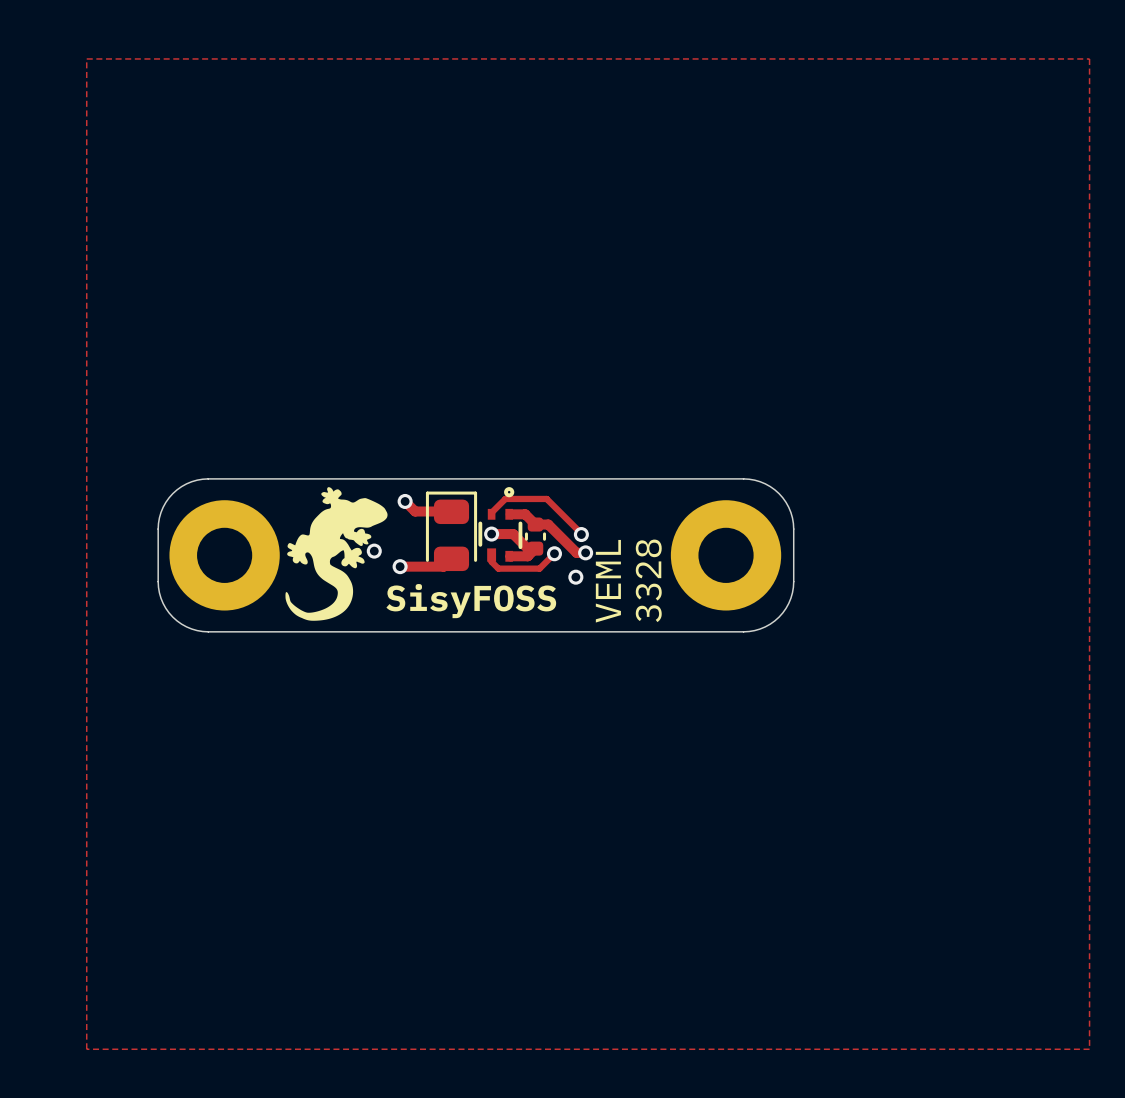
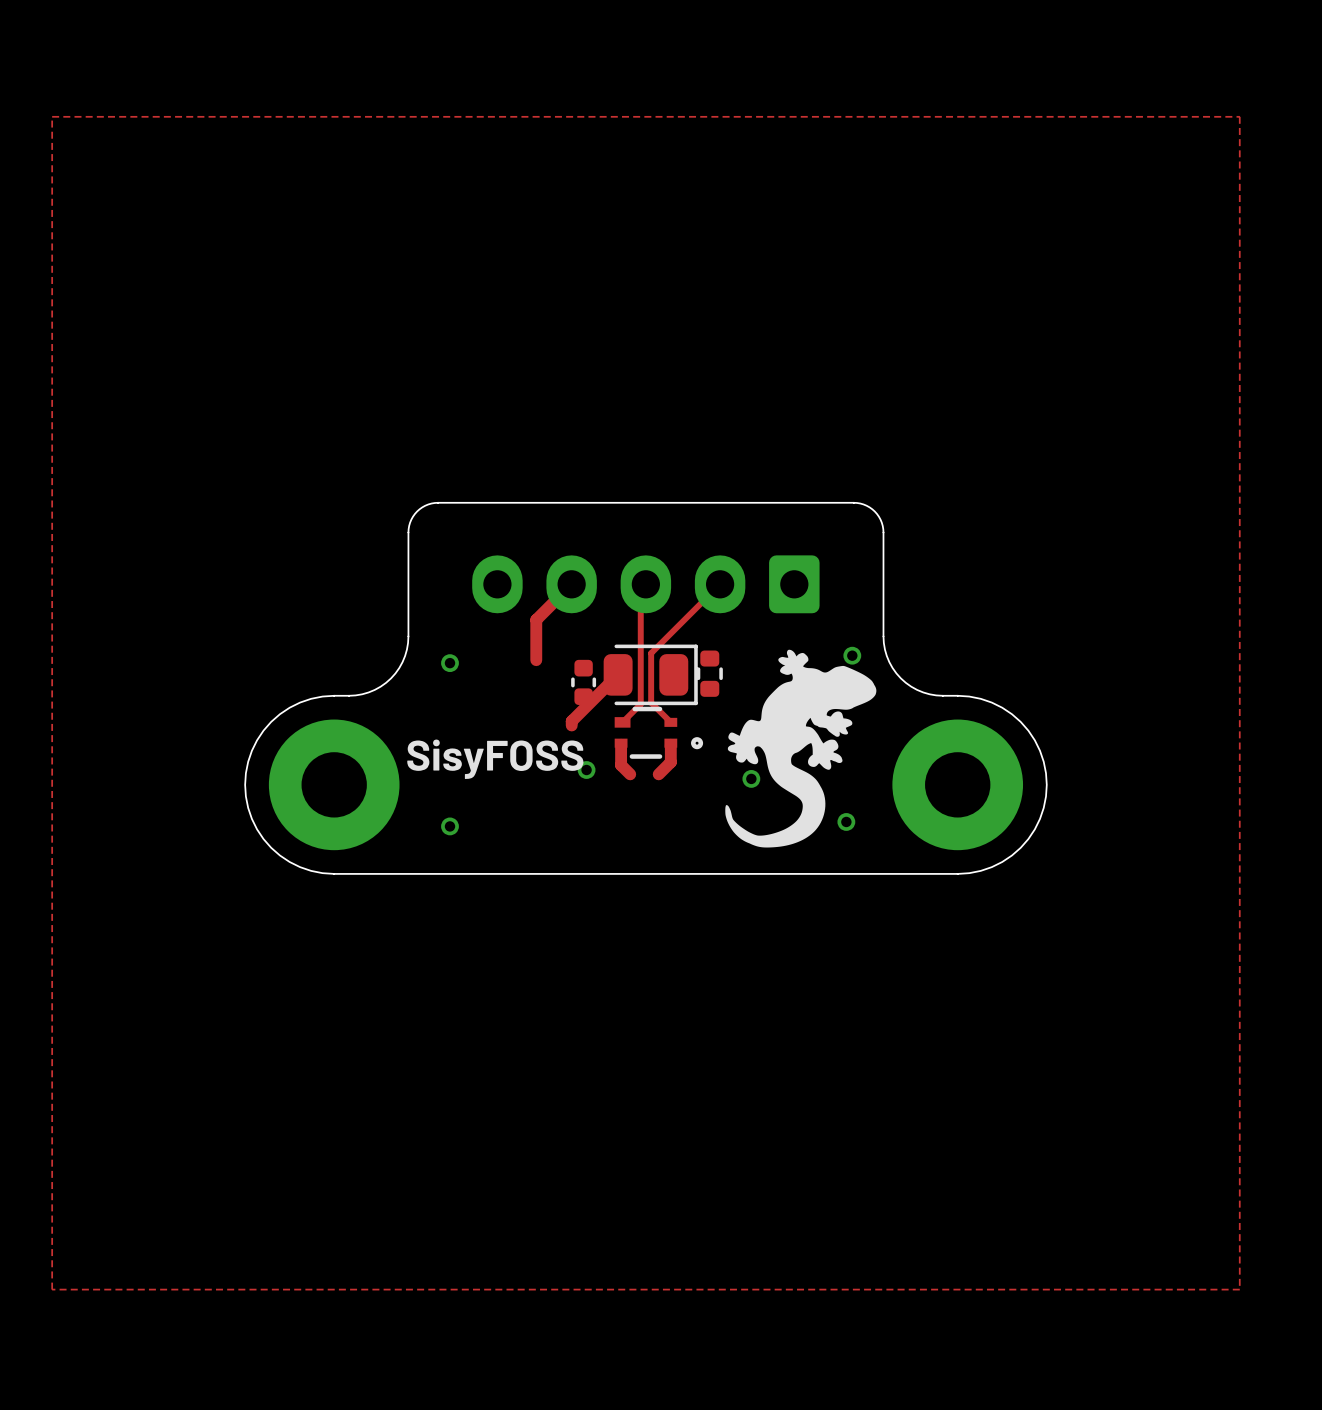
board edge: none -> (438, 502) (853, 502) (866, 505) (877, 513) (883, 529) (883, 636) (889, 662) (900, 678) (917, 689) (936, 695) (969, 696) (991, 702) (1011, 714) (1028, 730) (1040, 750) (1046, 773) (1046, 796) (1040, 818) (1034, 829) (1020, 847) (1002, 861) (980, 870) (957, 873) (334, 873) (311, 870) (289, 861) (279, 855) (263, 839) (251, 818) (245, 796) (245, 784) (245, 773) (251, 750) (263, 730) (279, 714) (289, 707) (300, 702) (322, 696) (355, 695) (368, 692) (380, 686) (395, 673) (402, 662) (408, 643) (409, 525) (412, 516) (419, 509) (428, 504) (438, 502)
track: none -> (571, 584) (536, 619) (536, 660)
track: none -> (645, 584) (640, 589) (640, 704) (622, 722)
part: none -> (645, 584)
track: none -> (720, 584) (651, 653) (651, 702) (670, 722)
board edge: (208, 478) (754, 480) (774, 489) (782, 497) (790, 512) (793, 529) (792, 592) (786, 608) (779, 617) (765, 626) (749, 631) (197, 630) (177, 620) (165, 608) (160, 598) (158, 581) (158, 523) (165, 502) (177, 489) (191, 481) (208, 478) -> none
drawing: [285, 487, 388, 621] -> none
track: (405, 501) (415, 511) (451, 511) -> none
via: (405, 501) -> none
drawing: none -> [725, 649, 877, 848]
track: (491, 514) (505, 498) (546, 498) (581, 534) -> none
track: (510, 514) (525, 514) (535, 524) (548, 524) (576, 552) (585, 552) -> none
via: none -> (852, 655)
via: none -> (450, 663)
part rotation: 0° (500, 524) -> 90° clockwise (658, 732)
part position: (500, 524) -> (658, 732)
part: none -> (709, 673)
track: none -> (618, 674) (571, 721) (571, 725)
part rotation: 0° (451, 531) -> 90° clockwise (650, 674)
part position: (451, 531) -> (650, 674)
track: (491, 534) (513, 534) (527, 548) (535, 548) (527, 556) (510, 556) -> none
via: (491, 534) -> none
via: (581, 534) -> none
via: (374, 551) -> none
via: (585, 552) -> none
track: (554, 553) (539, 568) (498, 568) (491, 561) (491, 555) -> none
via: (554, 553) -> none
part position: (224, 555) -> (334, 784)
part position: (726, 555) -> (957, 784)
track: (451, 558) (443, 566) (400, 566) -> none
via: (400, 566) -> none
via: (575, 577) -> none
text: 3328 (648, 580) -> none
text: VEML (608, 581) -> none
track: none -> (621, 744) (621, 765) (630, 774)
track: none -> (670, 744) (670, 762) (658, 774)
via: none -> (586, 770)
via: none -> (751, 778)
via: none -> (846, 821)
via: none -> (450, 826)

